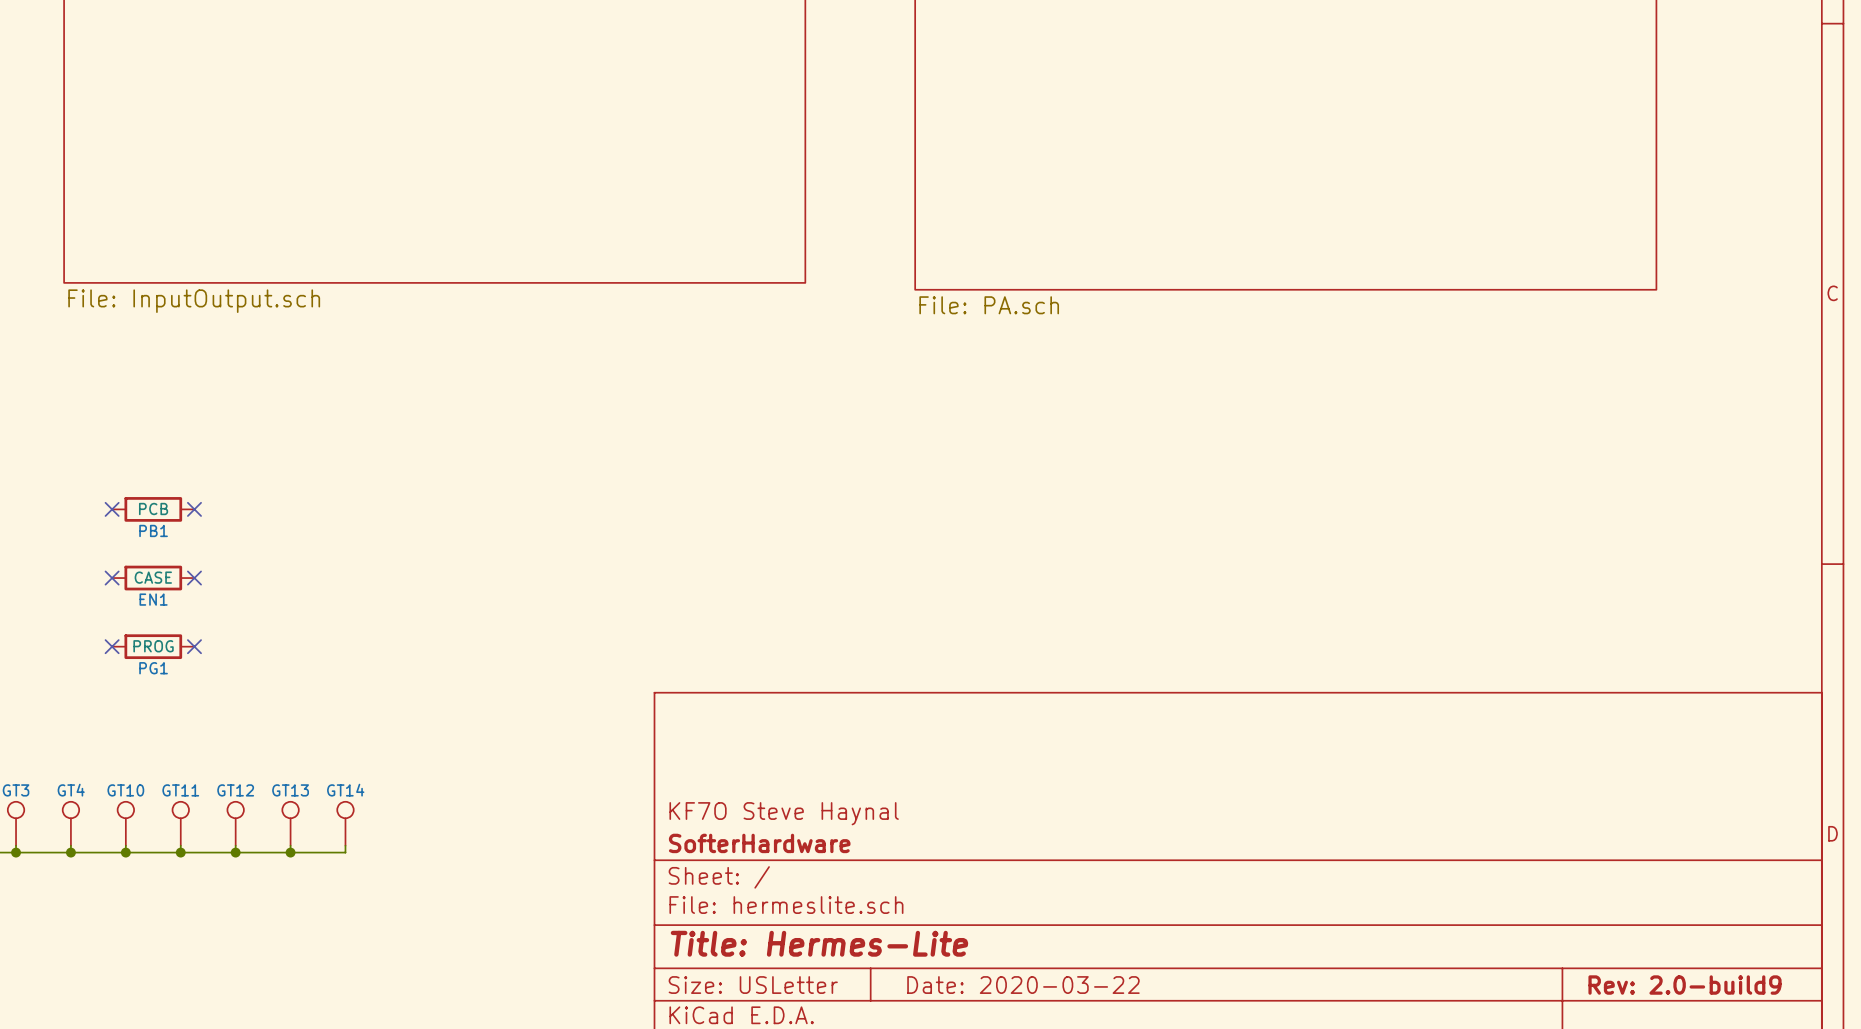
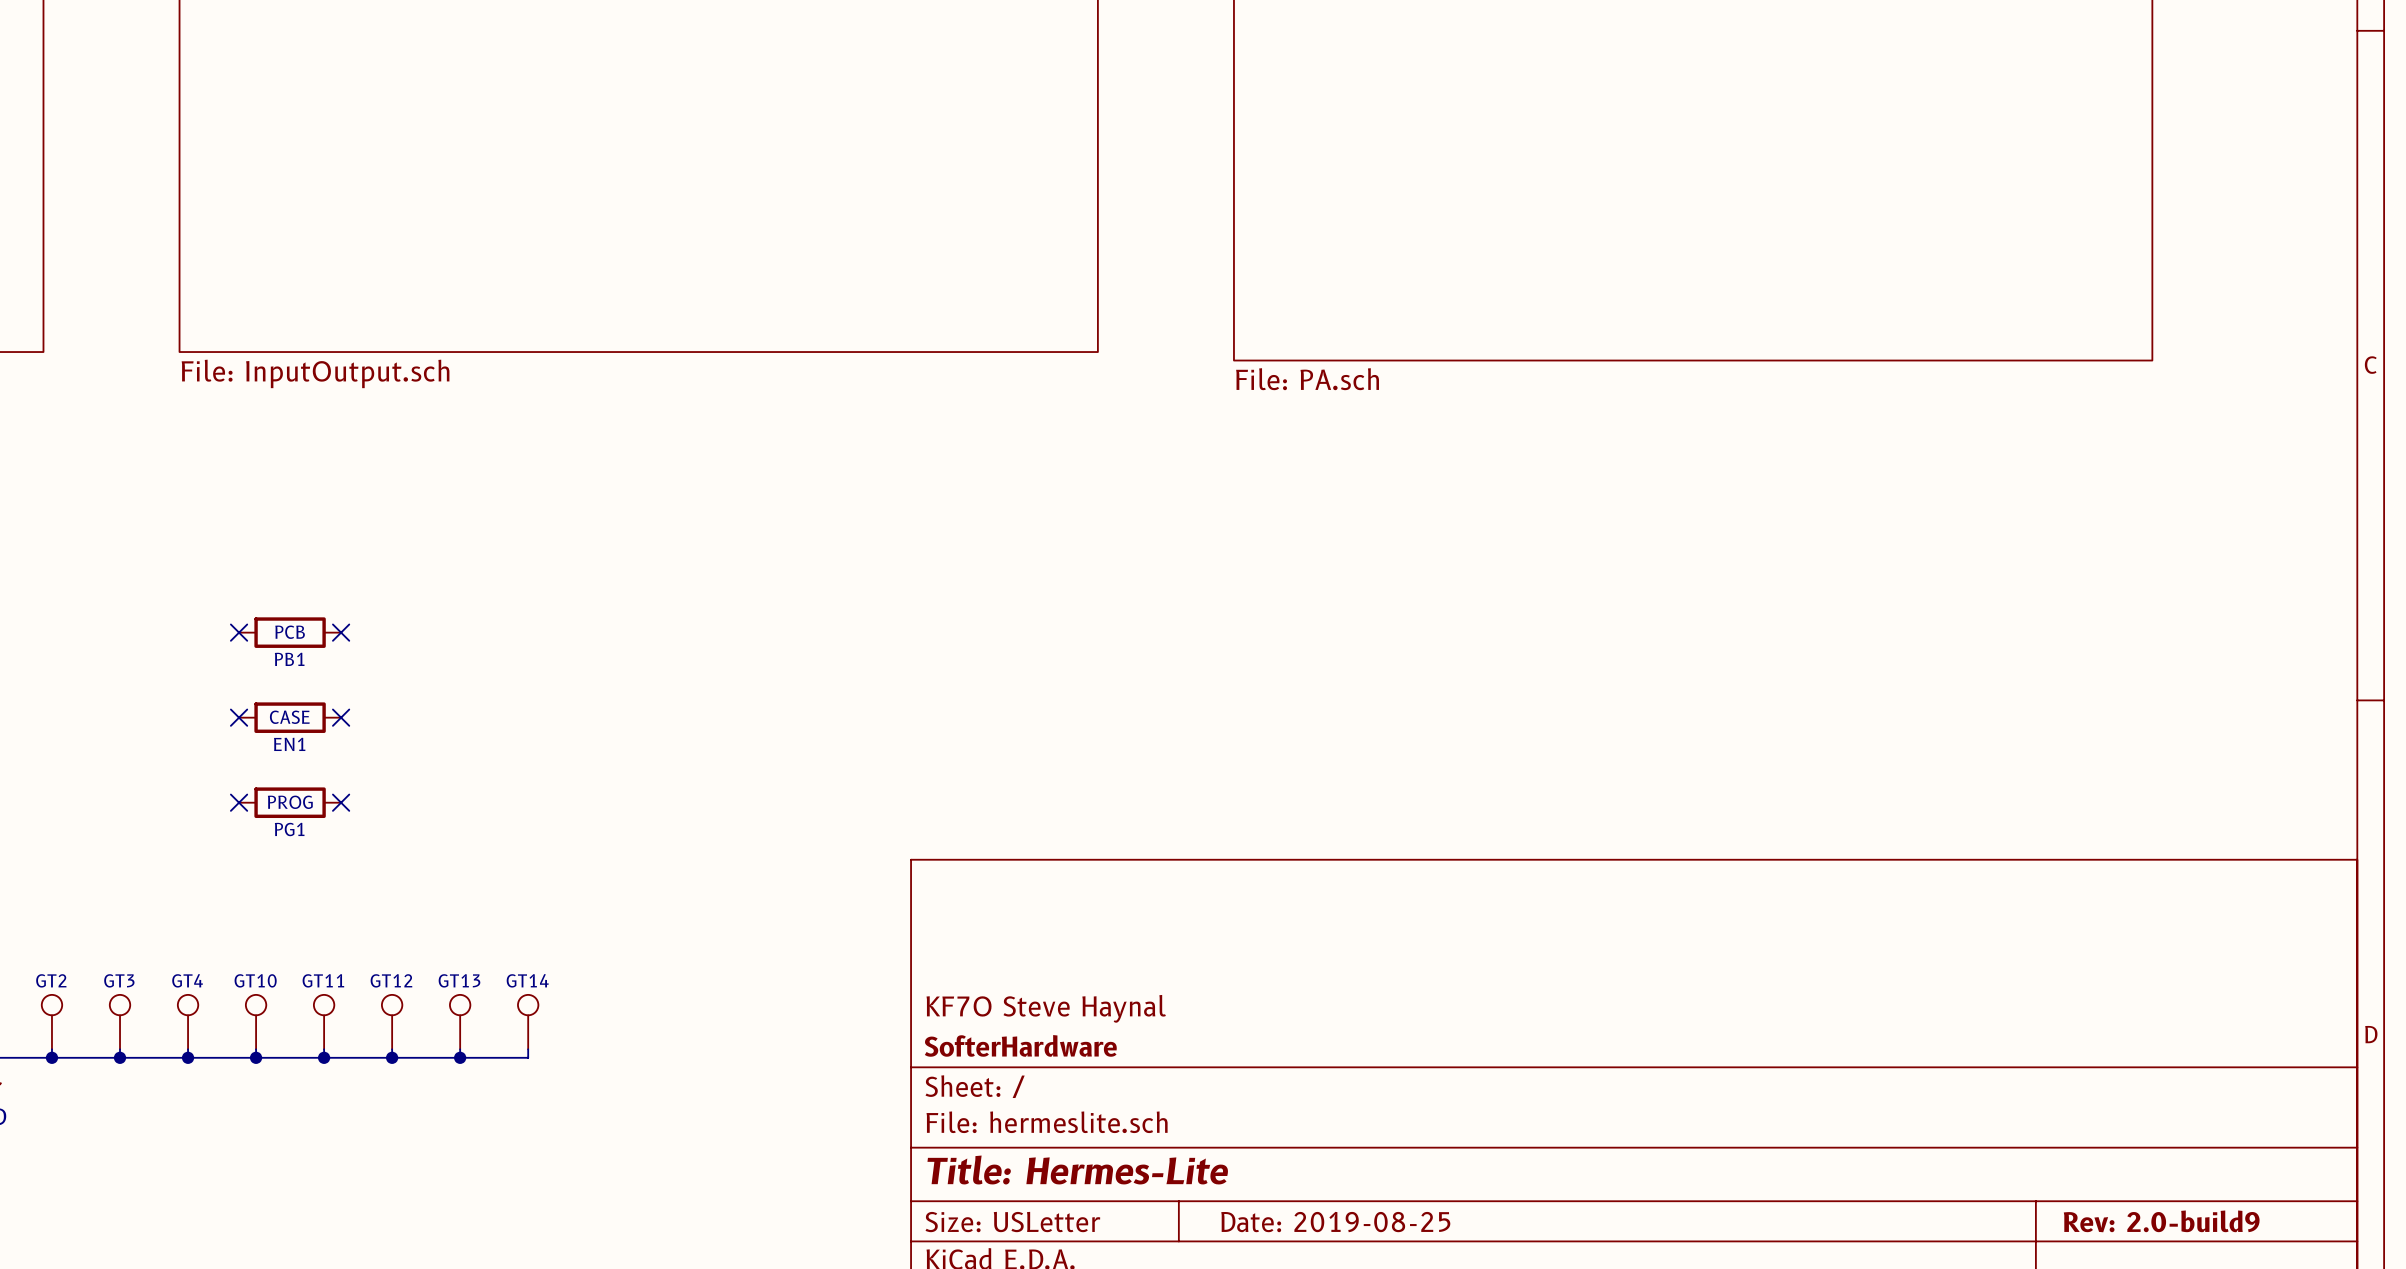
title block: Date: 2020-03-22 (1023, 985) -> Date: 2019-08-25 (1335, 1222)

